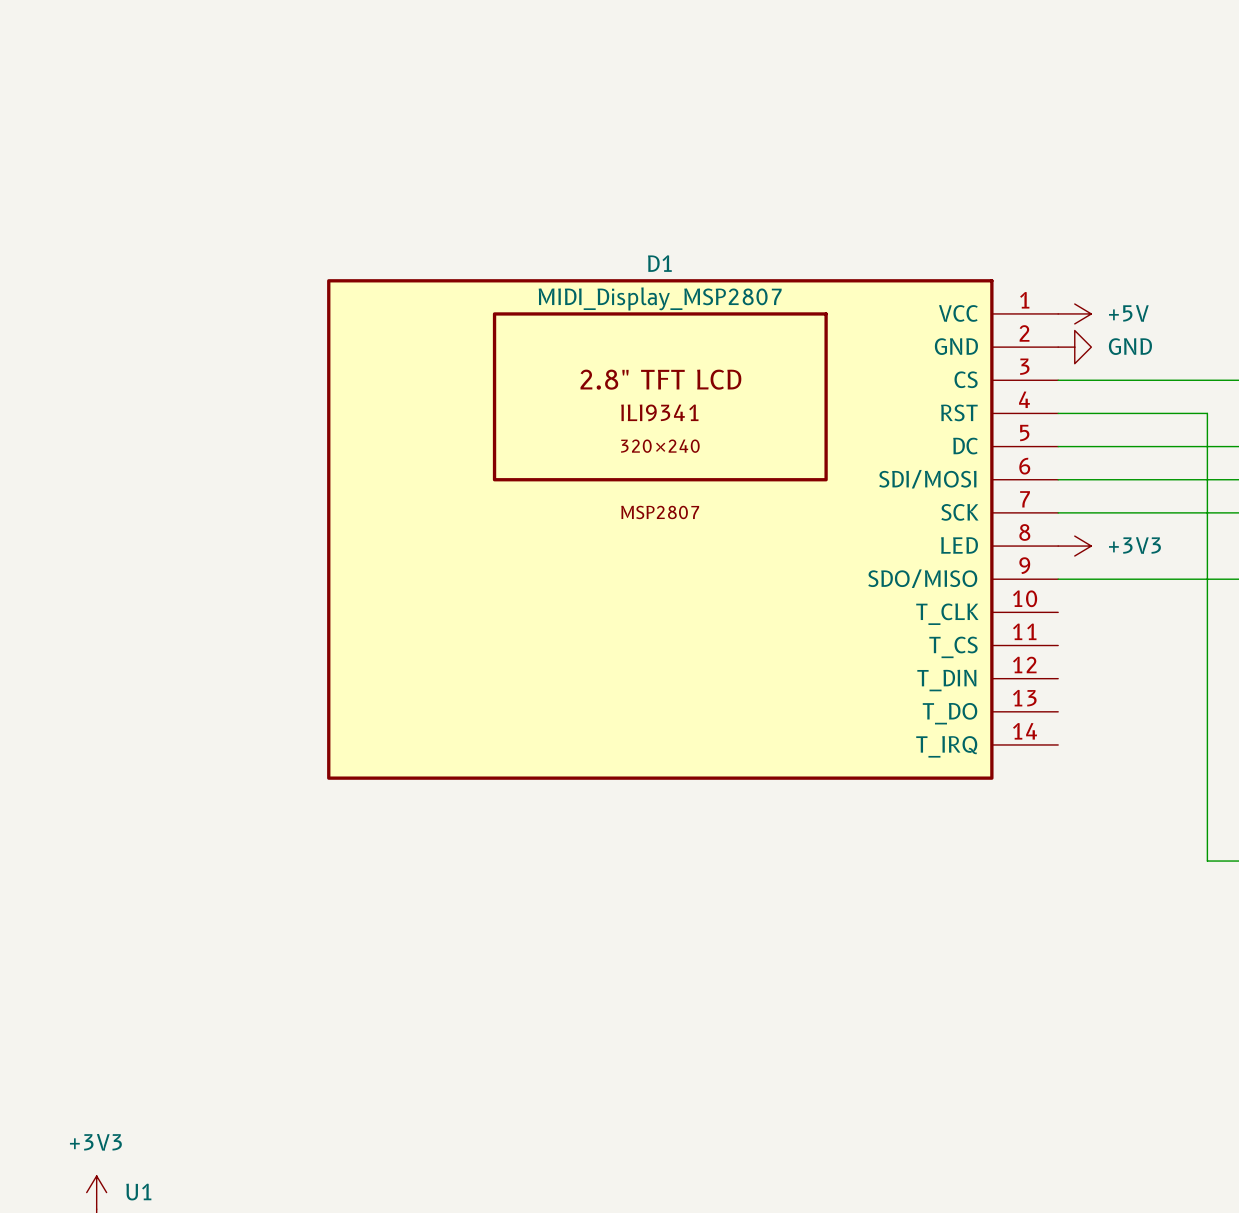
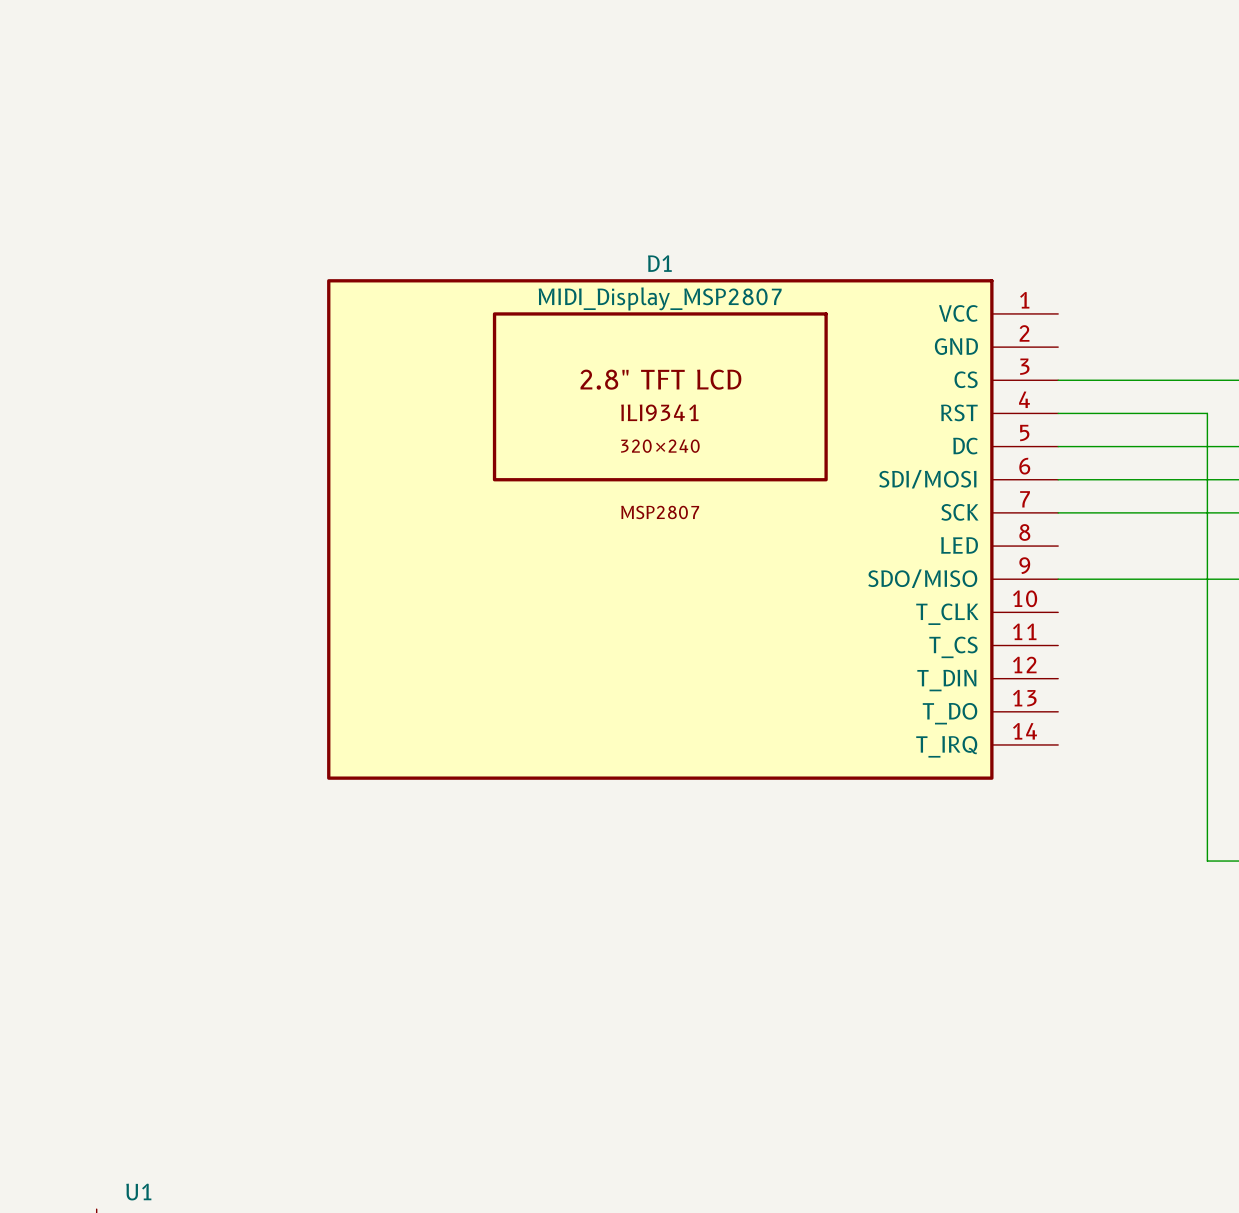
power symbol: +5V (1074, 313) -> none
power symbol: GND (1074, 347) -> none
power symbol: +3V3 (1074, 546) -> none
power symbol: +3V3 (96, 1192) -> none

